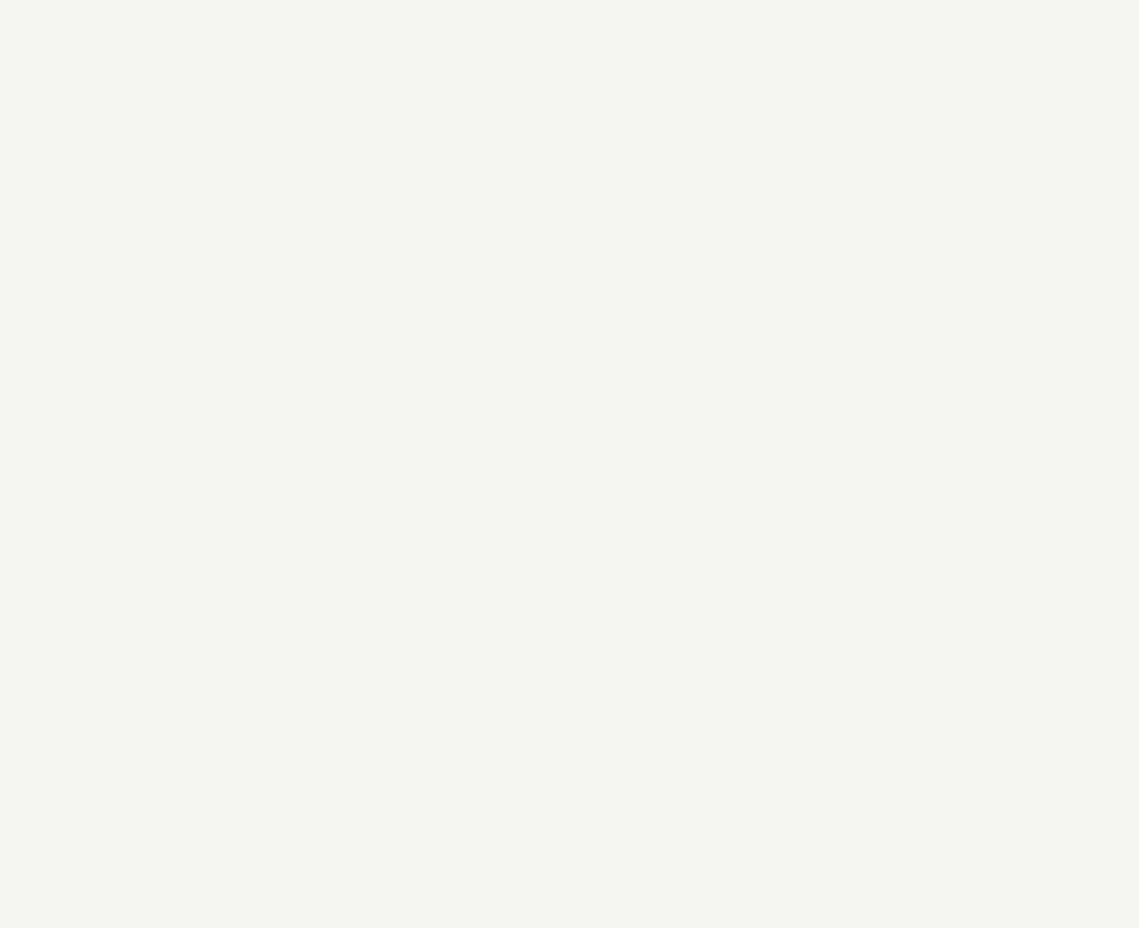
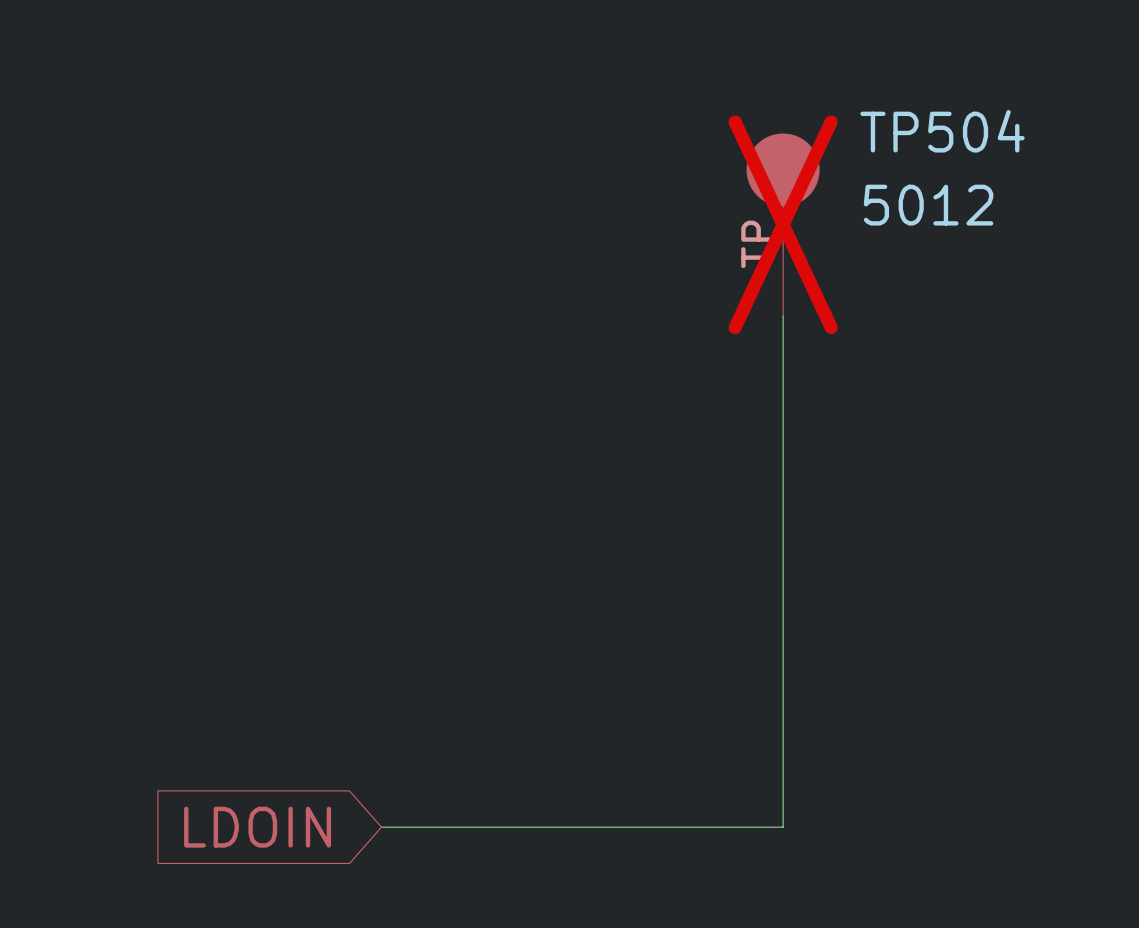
TP504: none -> 5012 (783, 224)
wire: none -> (783, 316) (783, 827) (381, 827)
global label: none -> LDOIN (257, 827)

